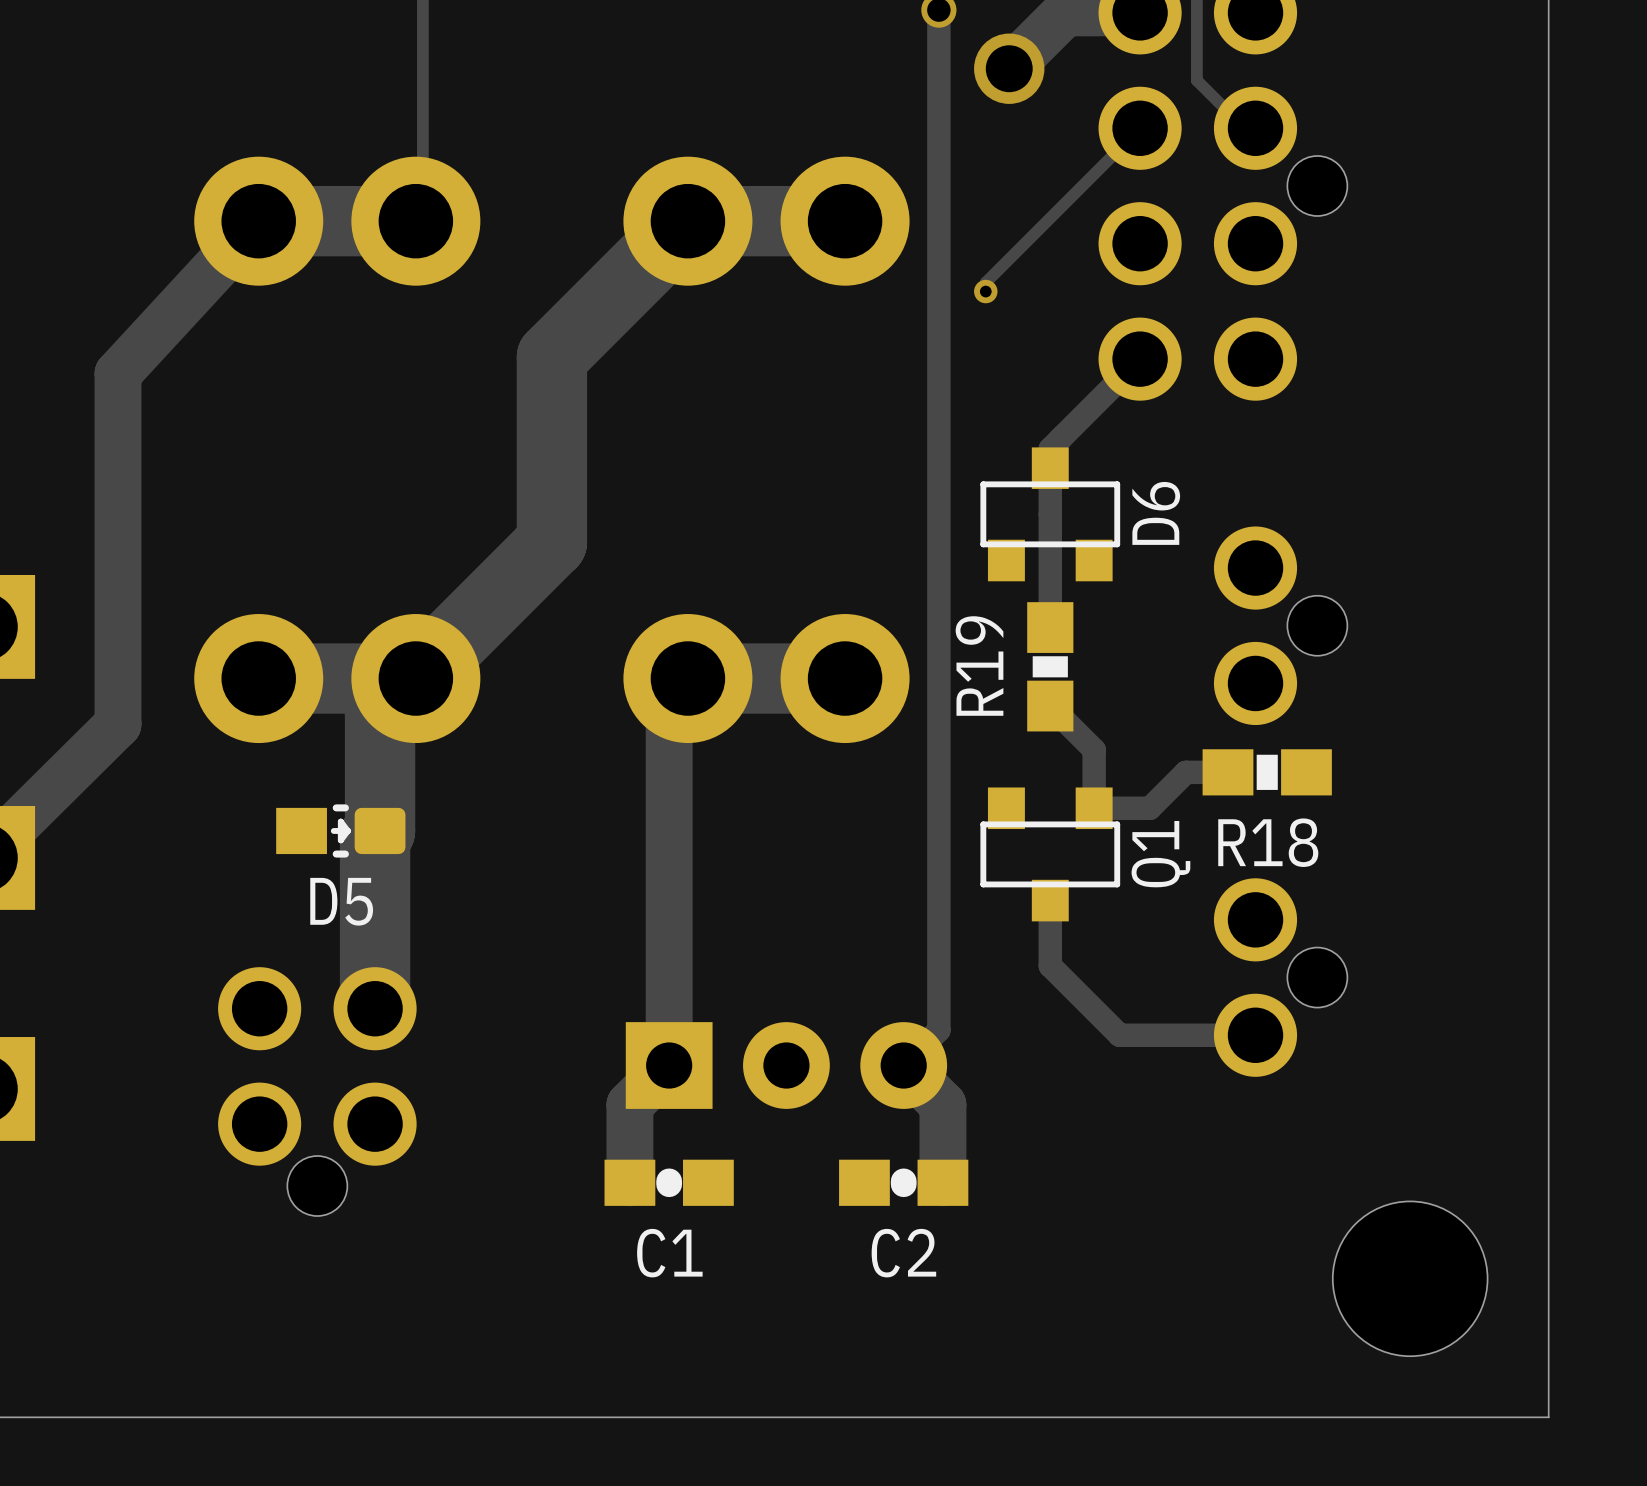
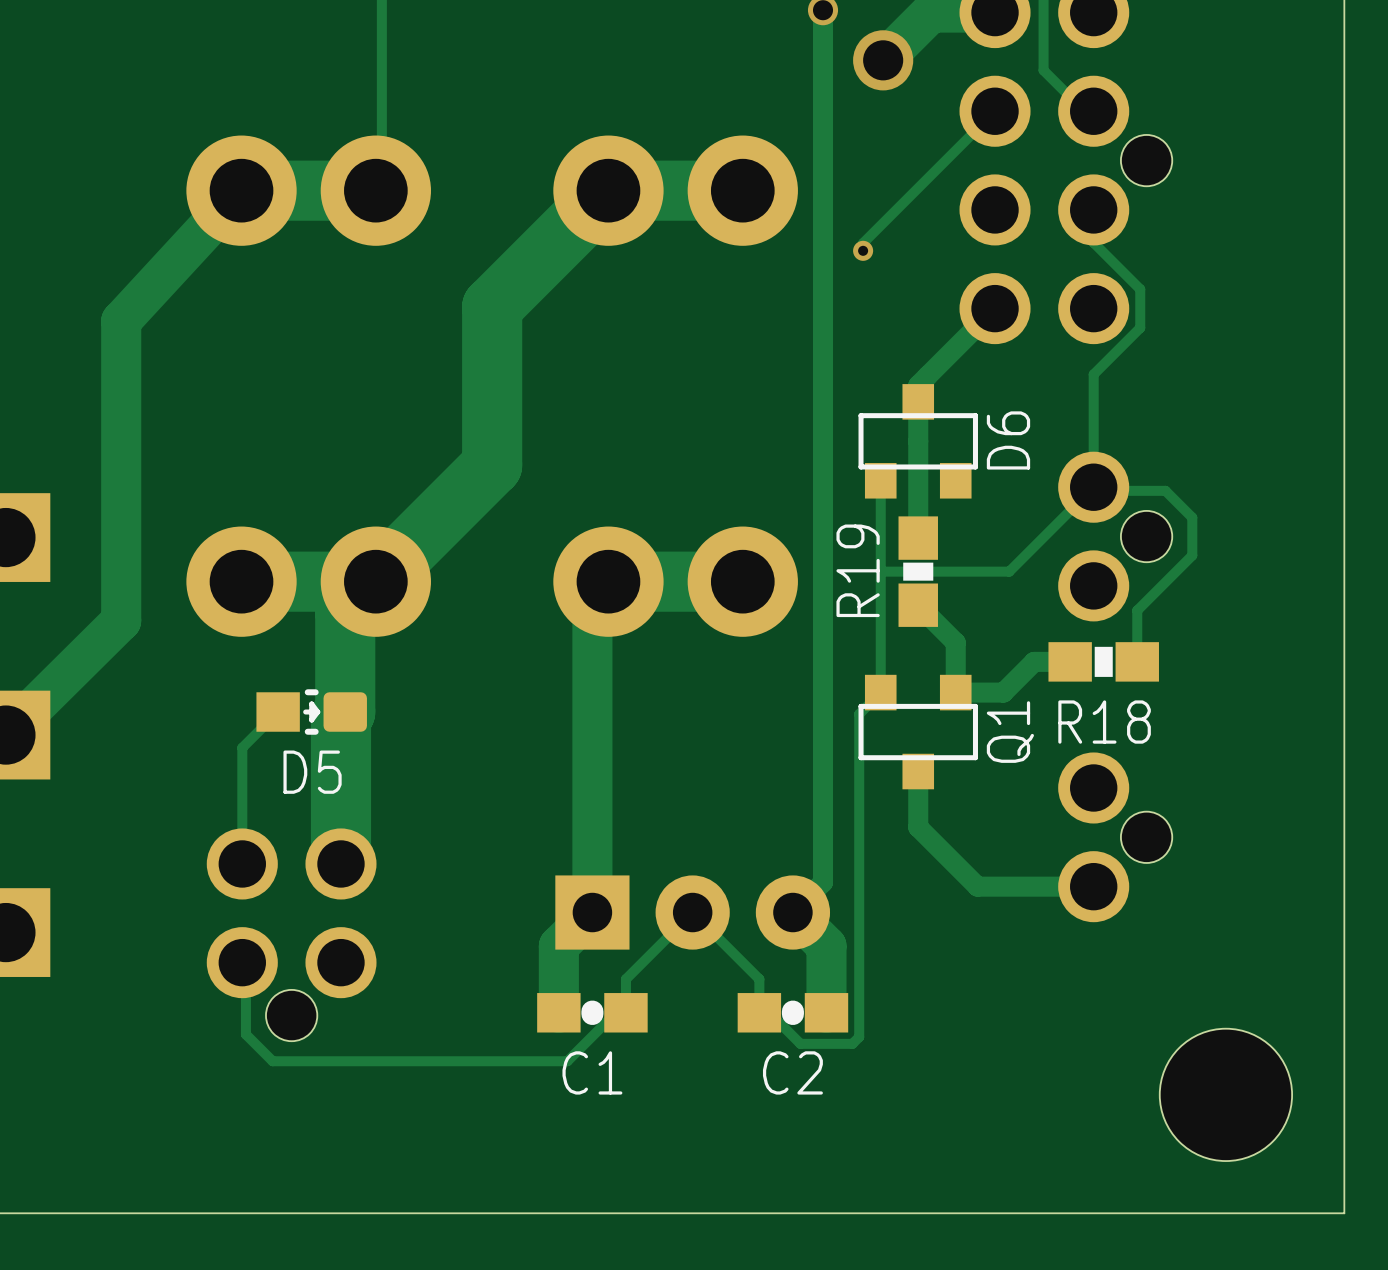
track: none -> (1093, 209) (1093, 242) (1140, 289) (1140, 327) (1093, 374) (1093, 487)
track: none -> (880, 480) (880, 692) (859, 714) (859, 1037) (852, 1043) (800, 1043) (769, 1012) (759, 1012) (759, 979) (692, 912) (625, 979) (625, 1012) (615, 1012) (567, 1061) (272, 1061) (245, 1034) (245, 966) (242, 962)
track: none -> (1093, 487) (1009, 571) (880, 571)
track: none -> (1093, 487) (1097, 490) (1165, 490) (1192, 517) (1192, 555) (1137, 610) (1137, 661)
track: none -> (278, 712) (242, 747) (242, 863)

